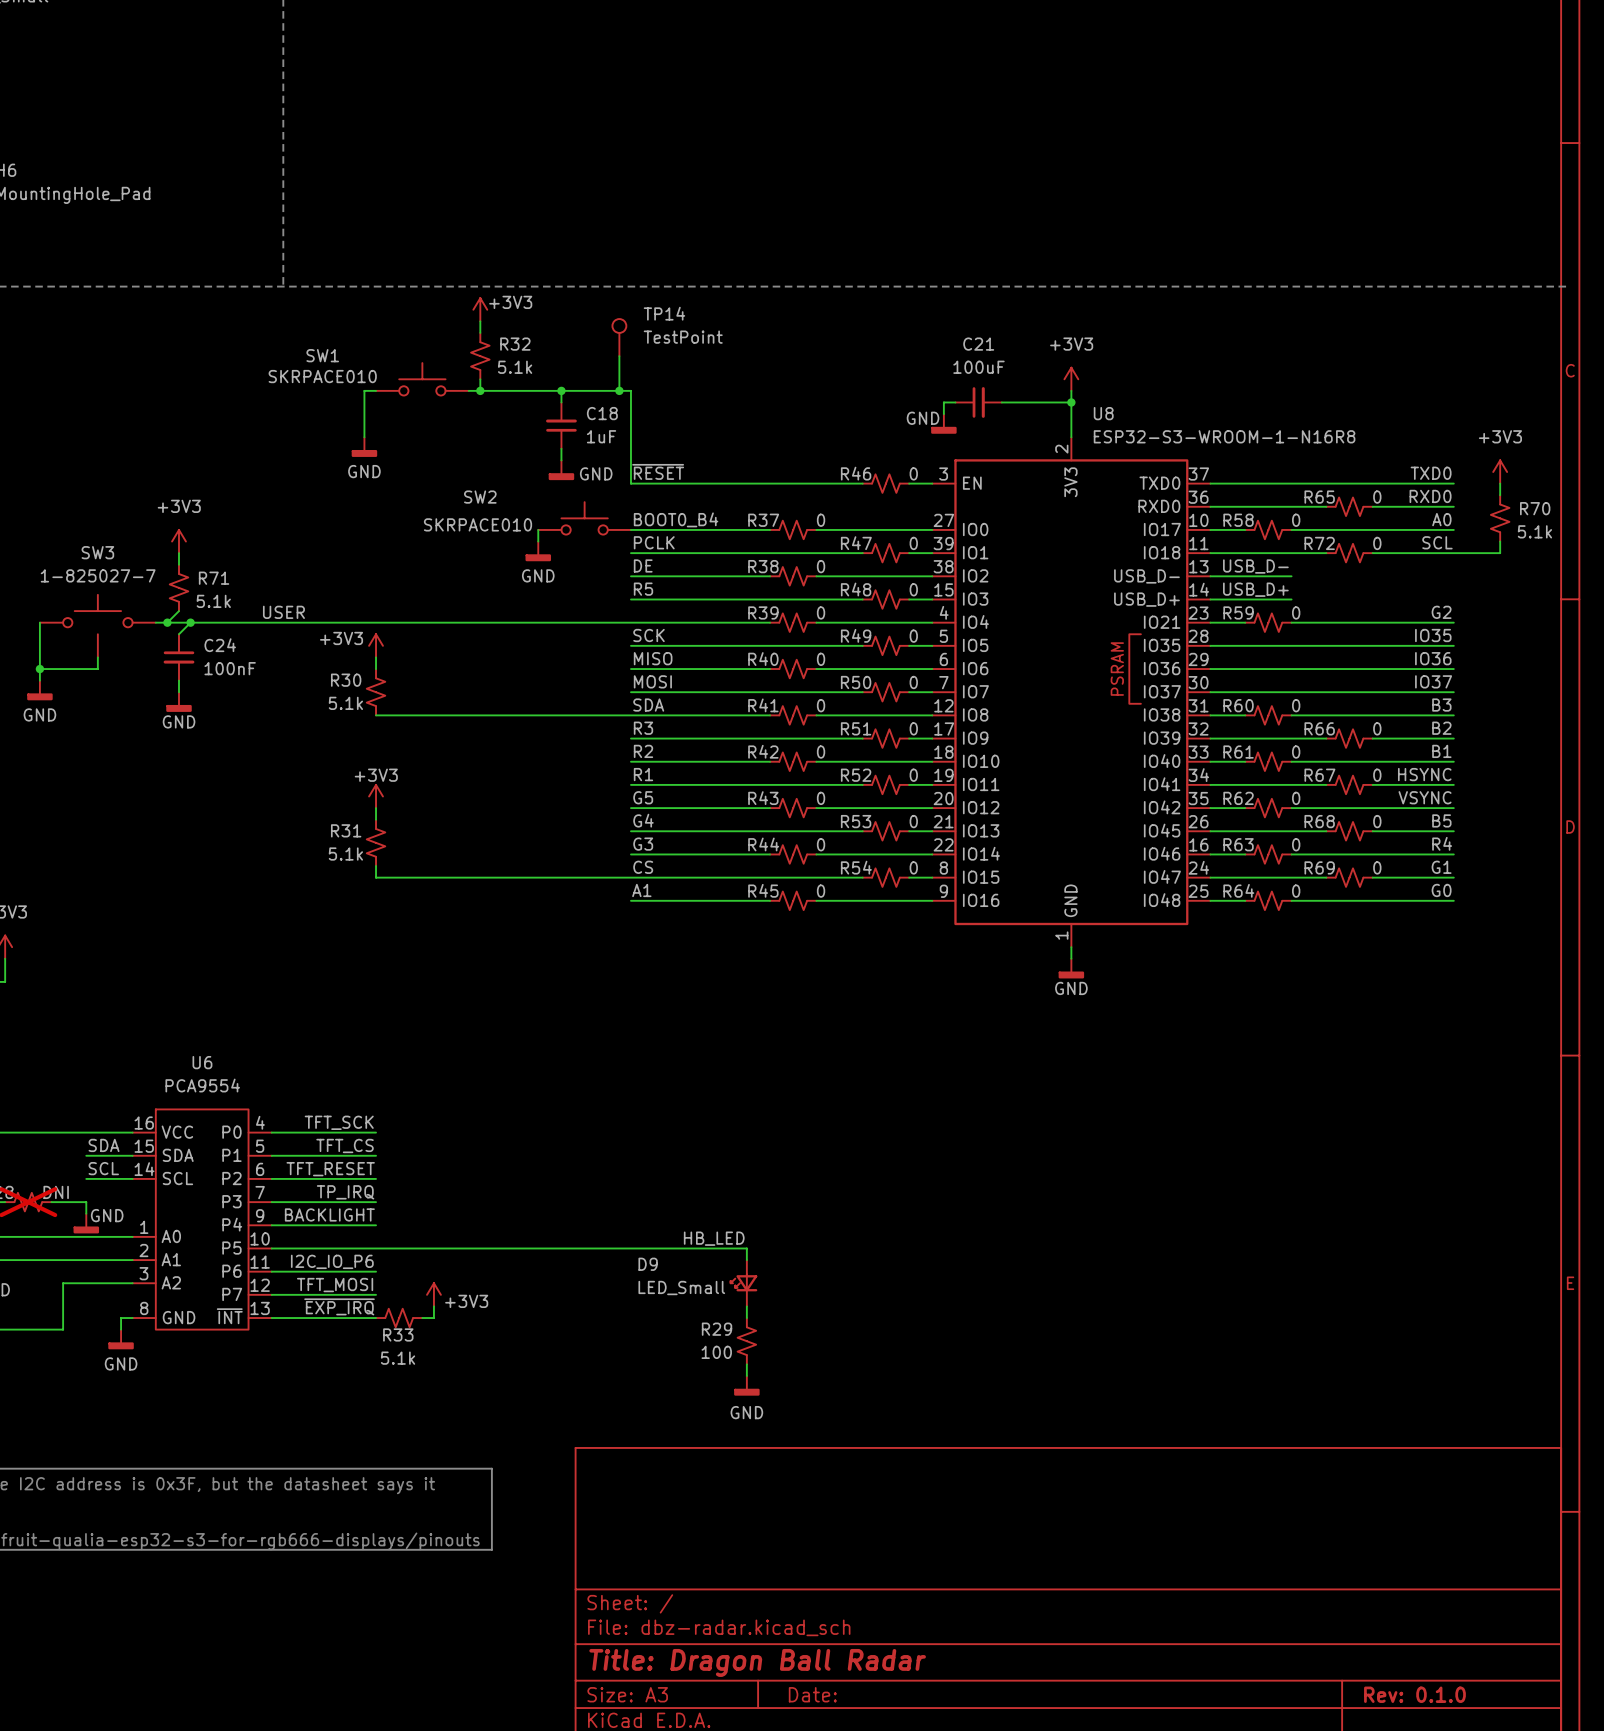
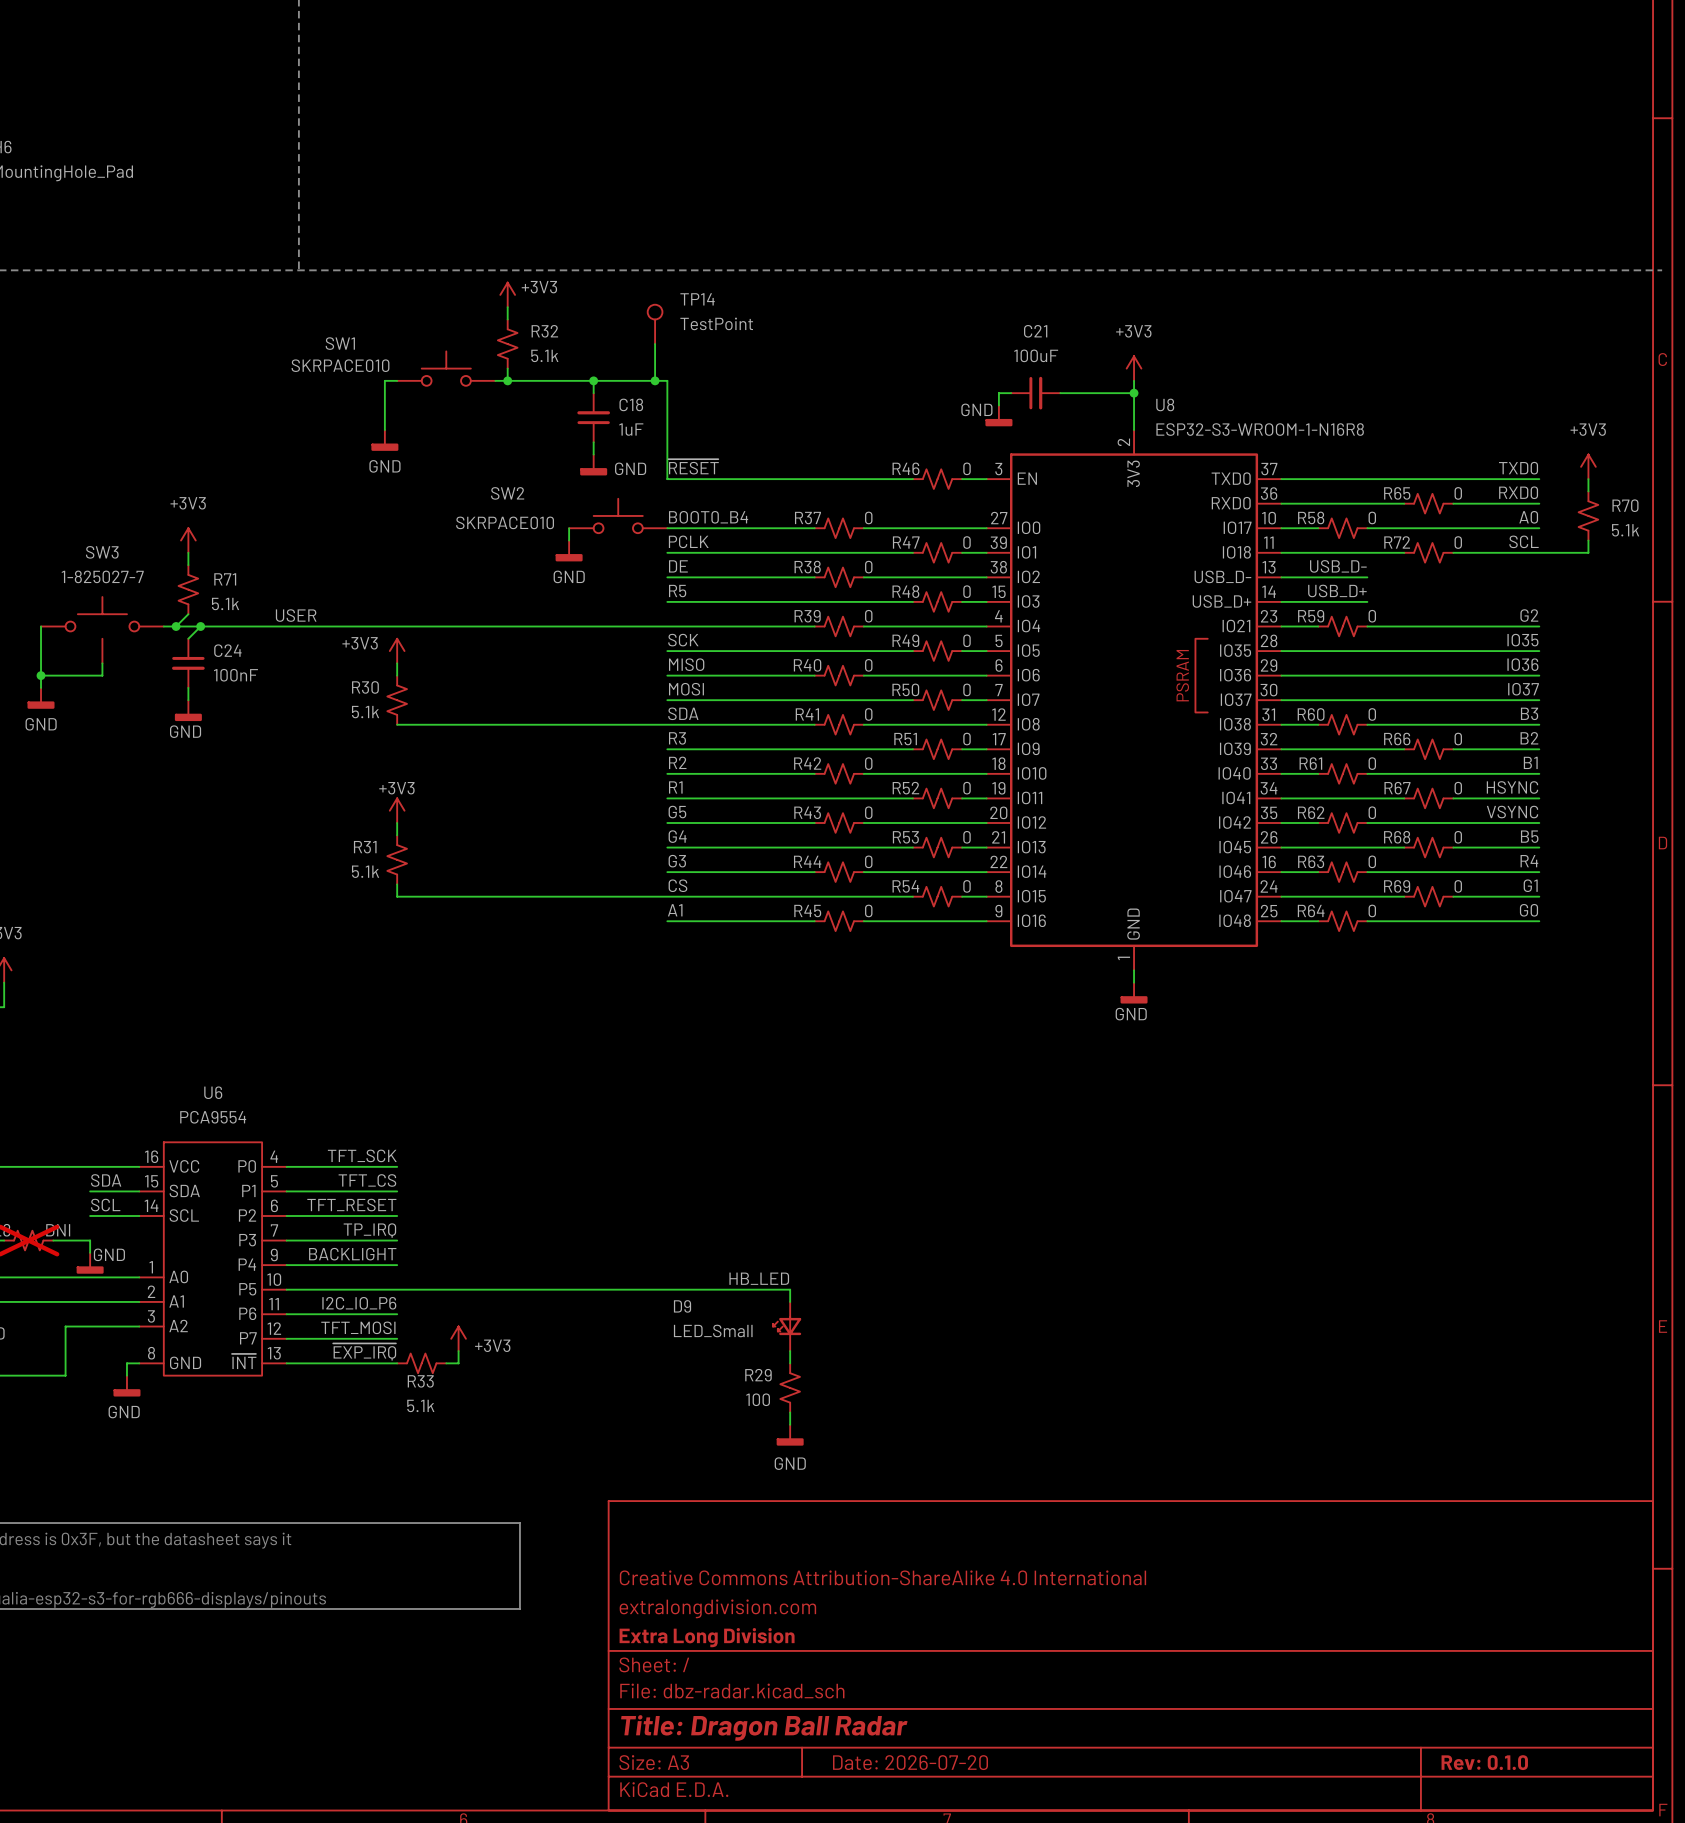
title block: none -> Creative Commons Attribution-ShareAlike 4.0 International (882, 1577)
title block: none -> extralongdivision.com (717, 1608)
title block: none -> Extra Long Division (707, 1637)
title block: Date: (812, 1694) -> Date: 2026-07-20 (910, 1762)

